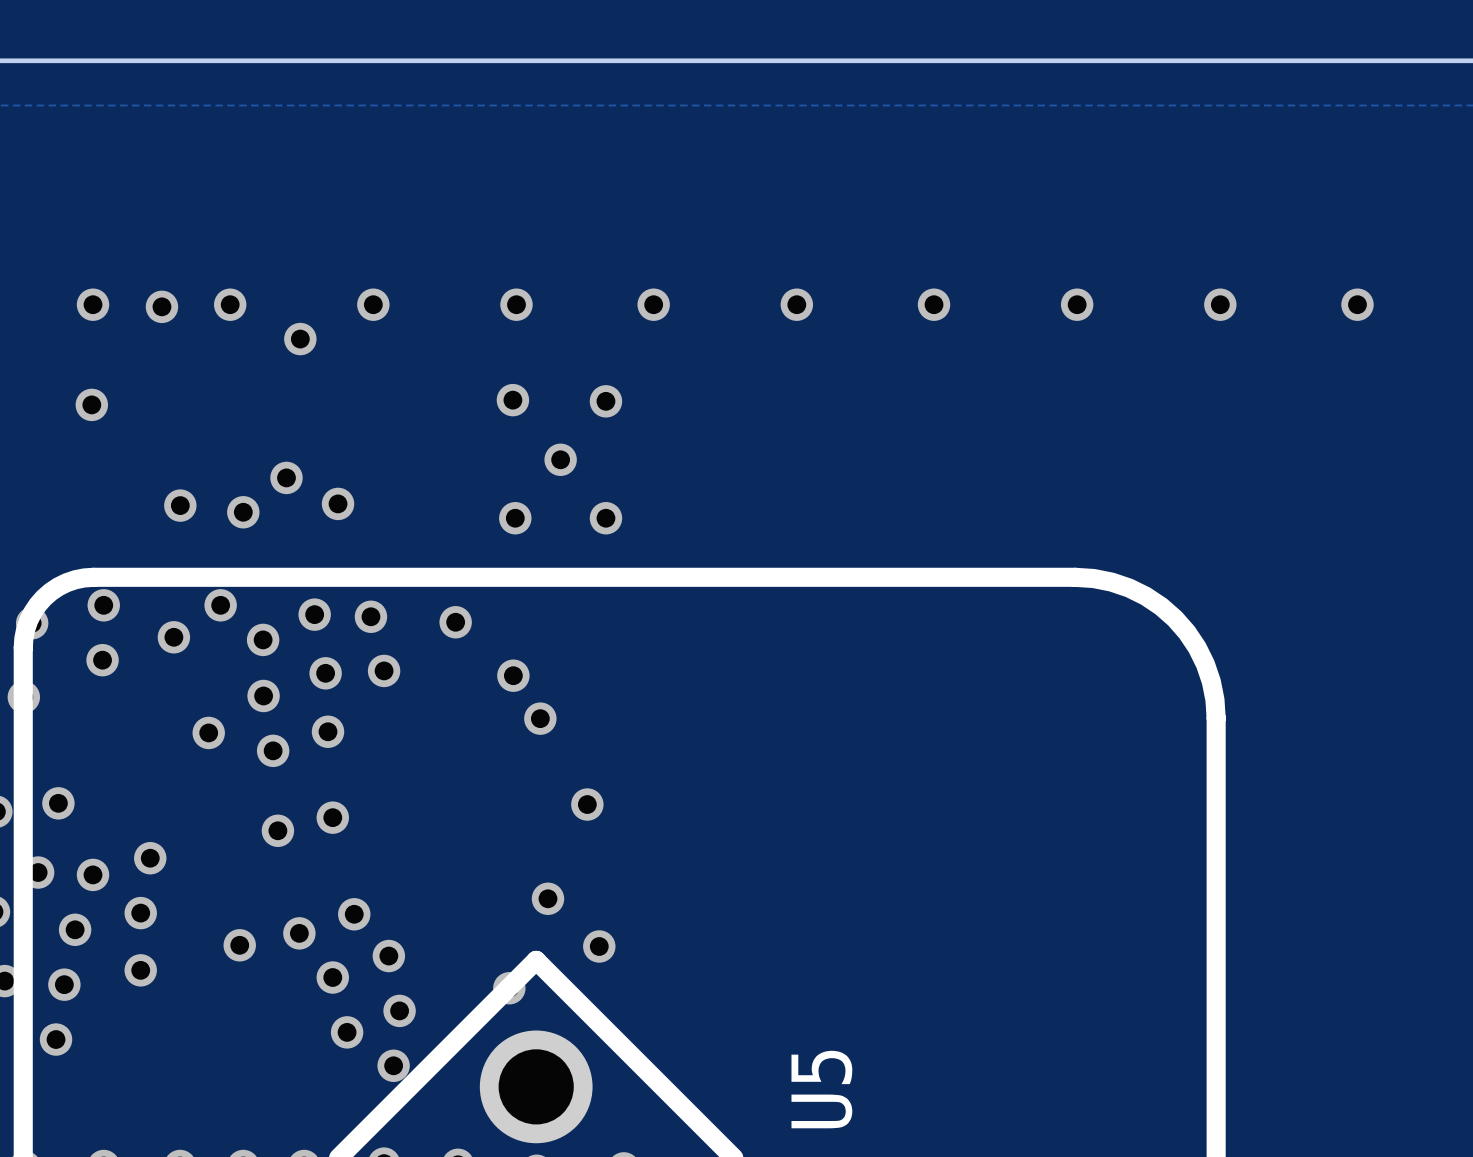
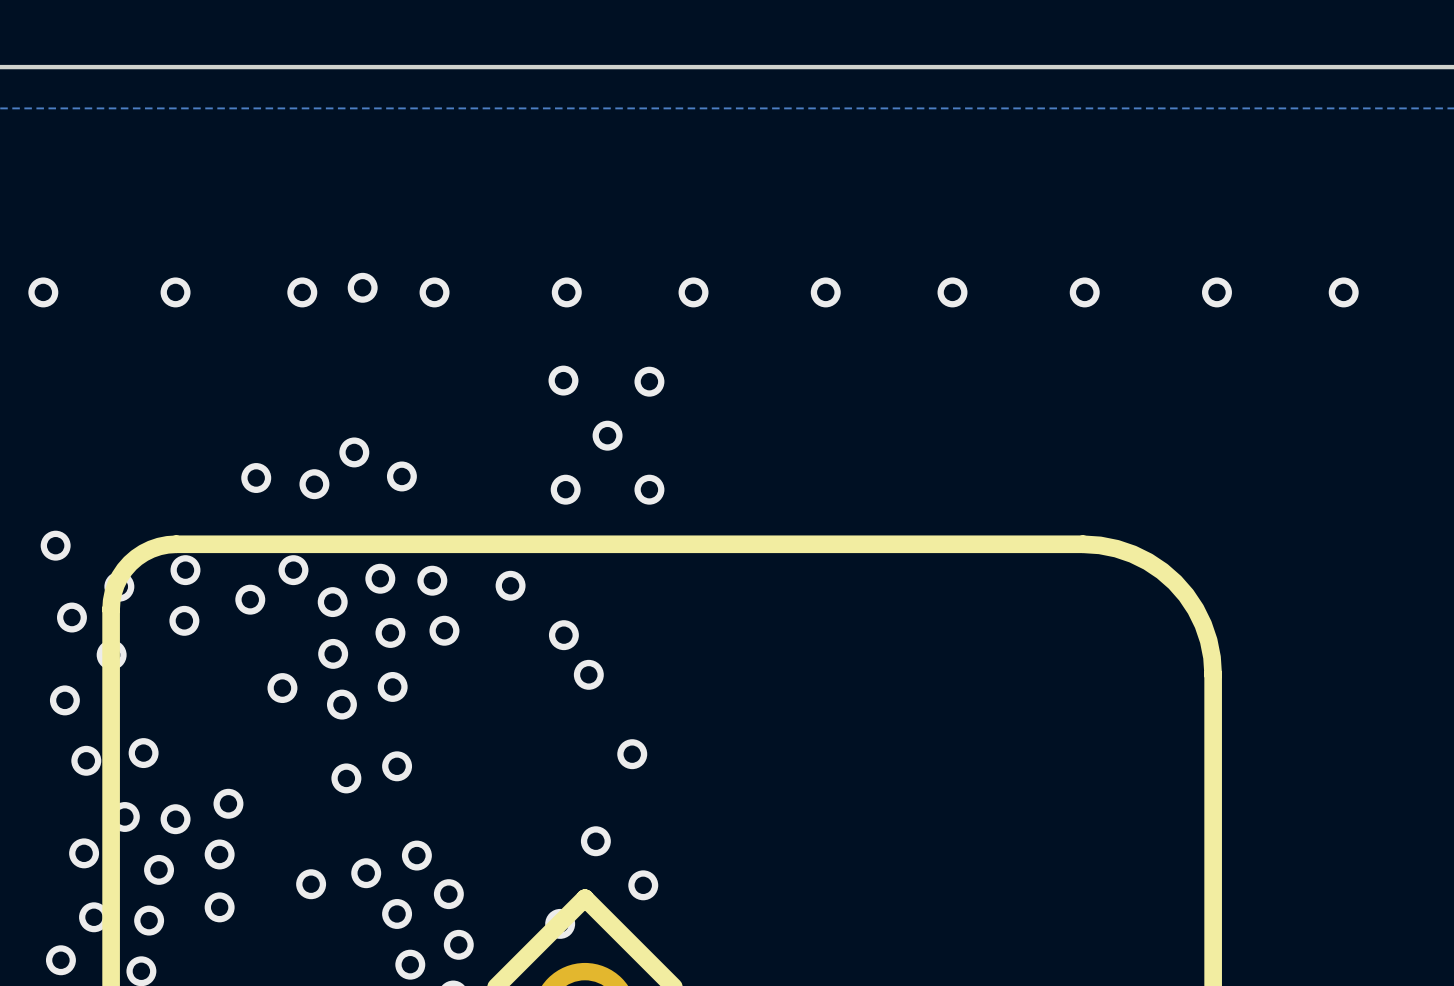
via: (161, 306) -> none
via position: (300, 339) -> (362, 287)
via: (91, 404) -> none

